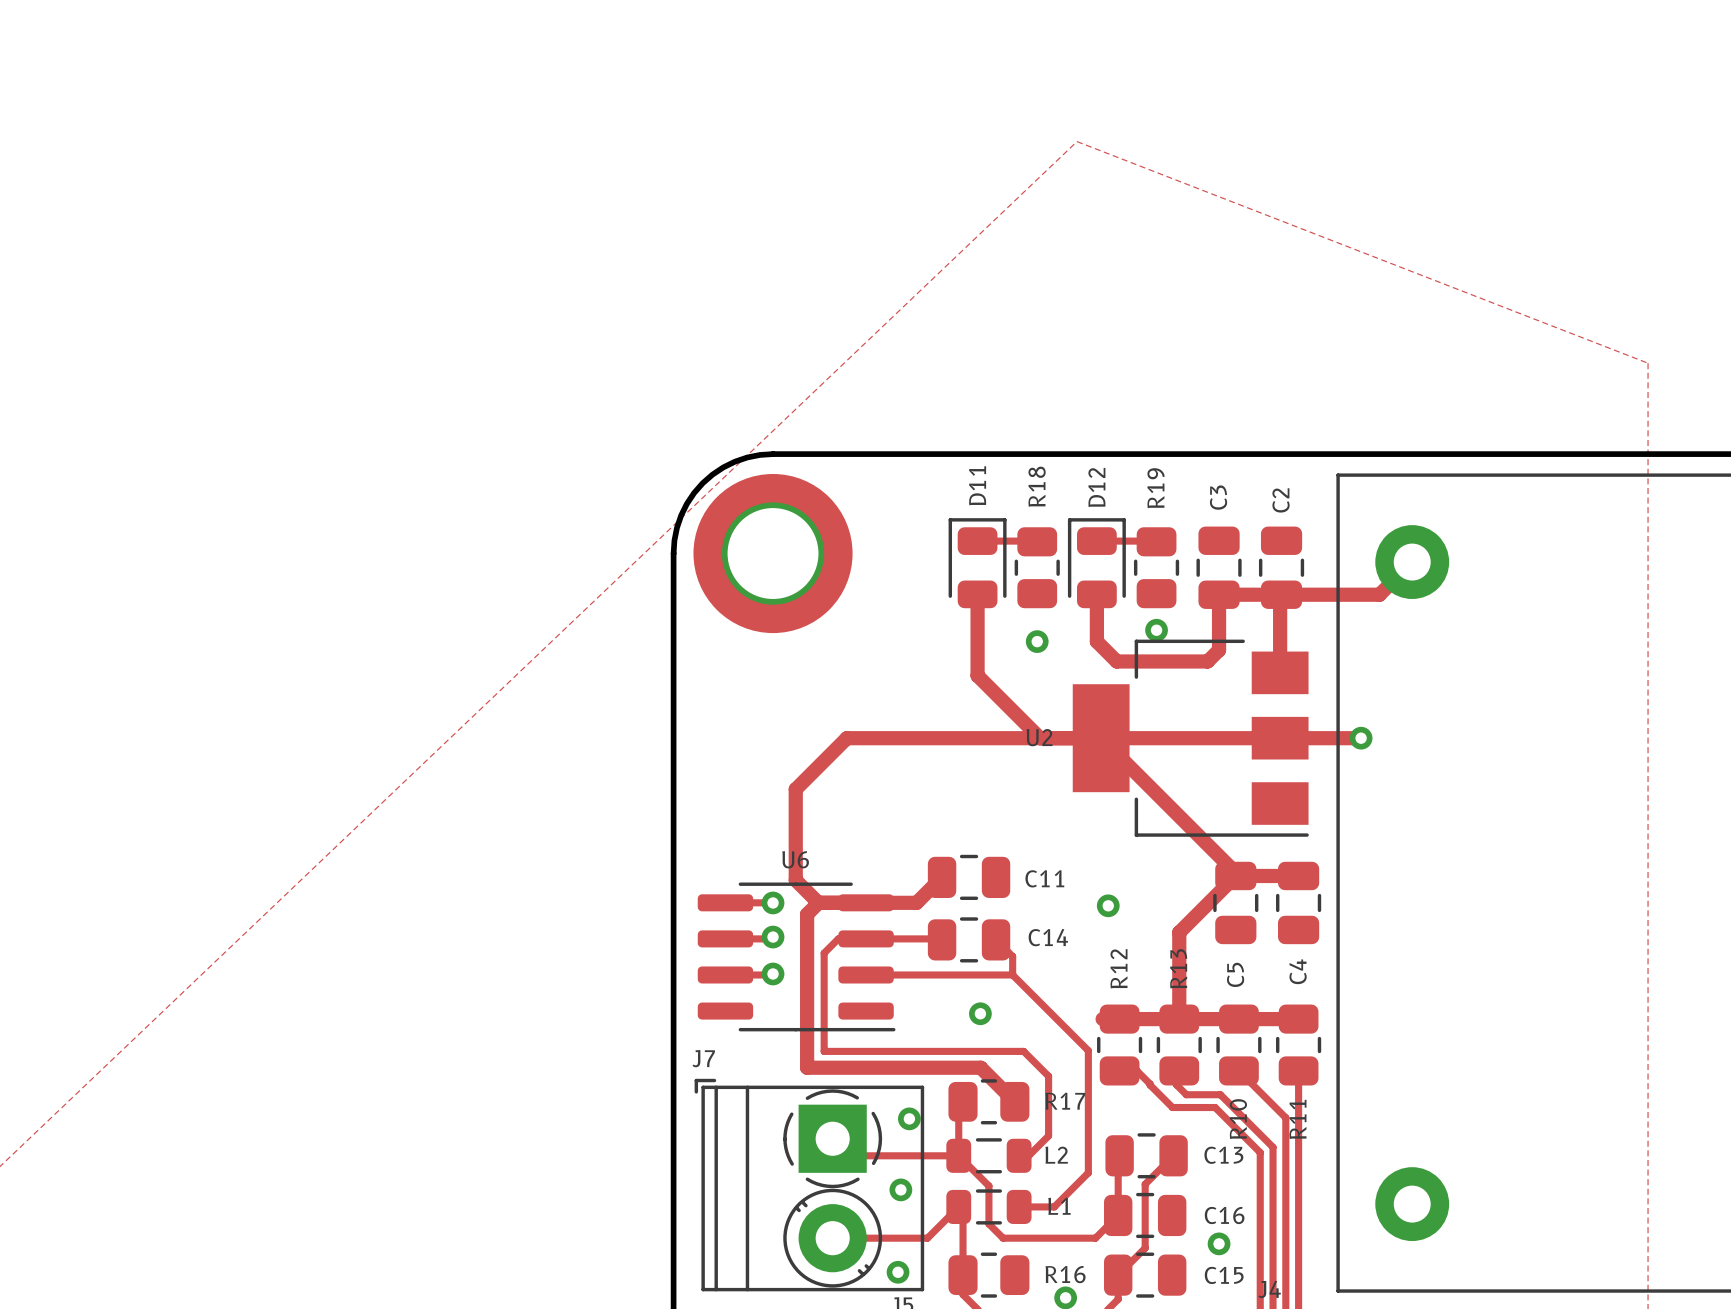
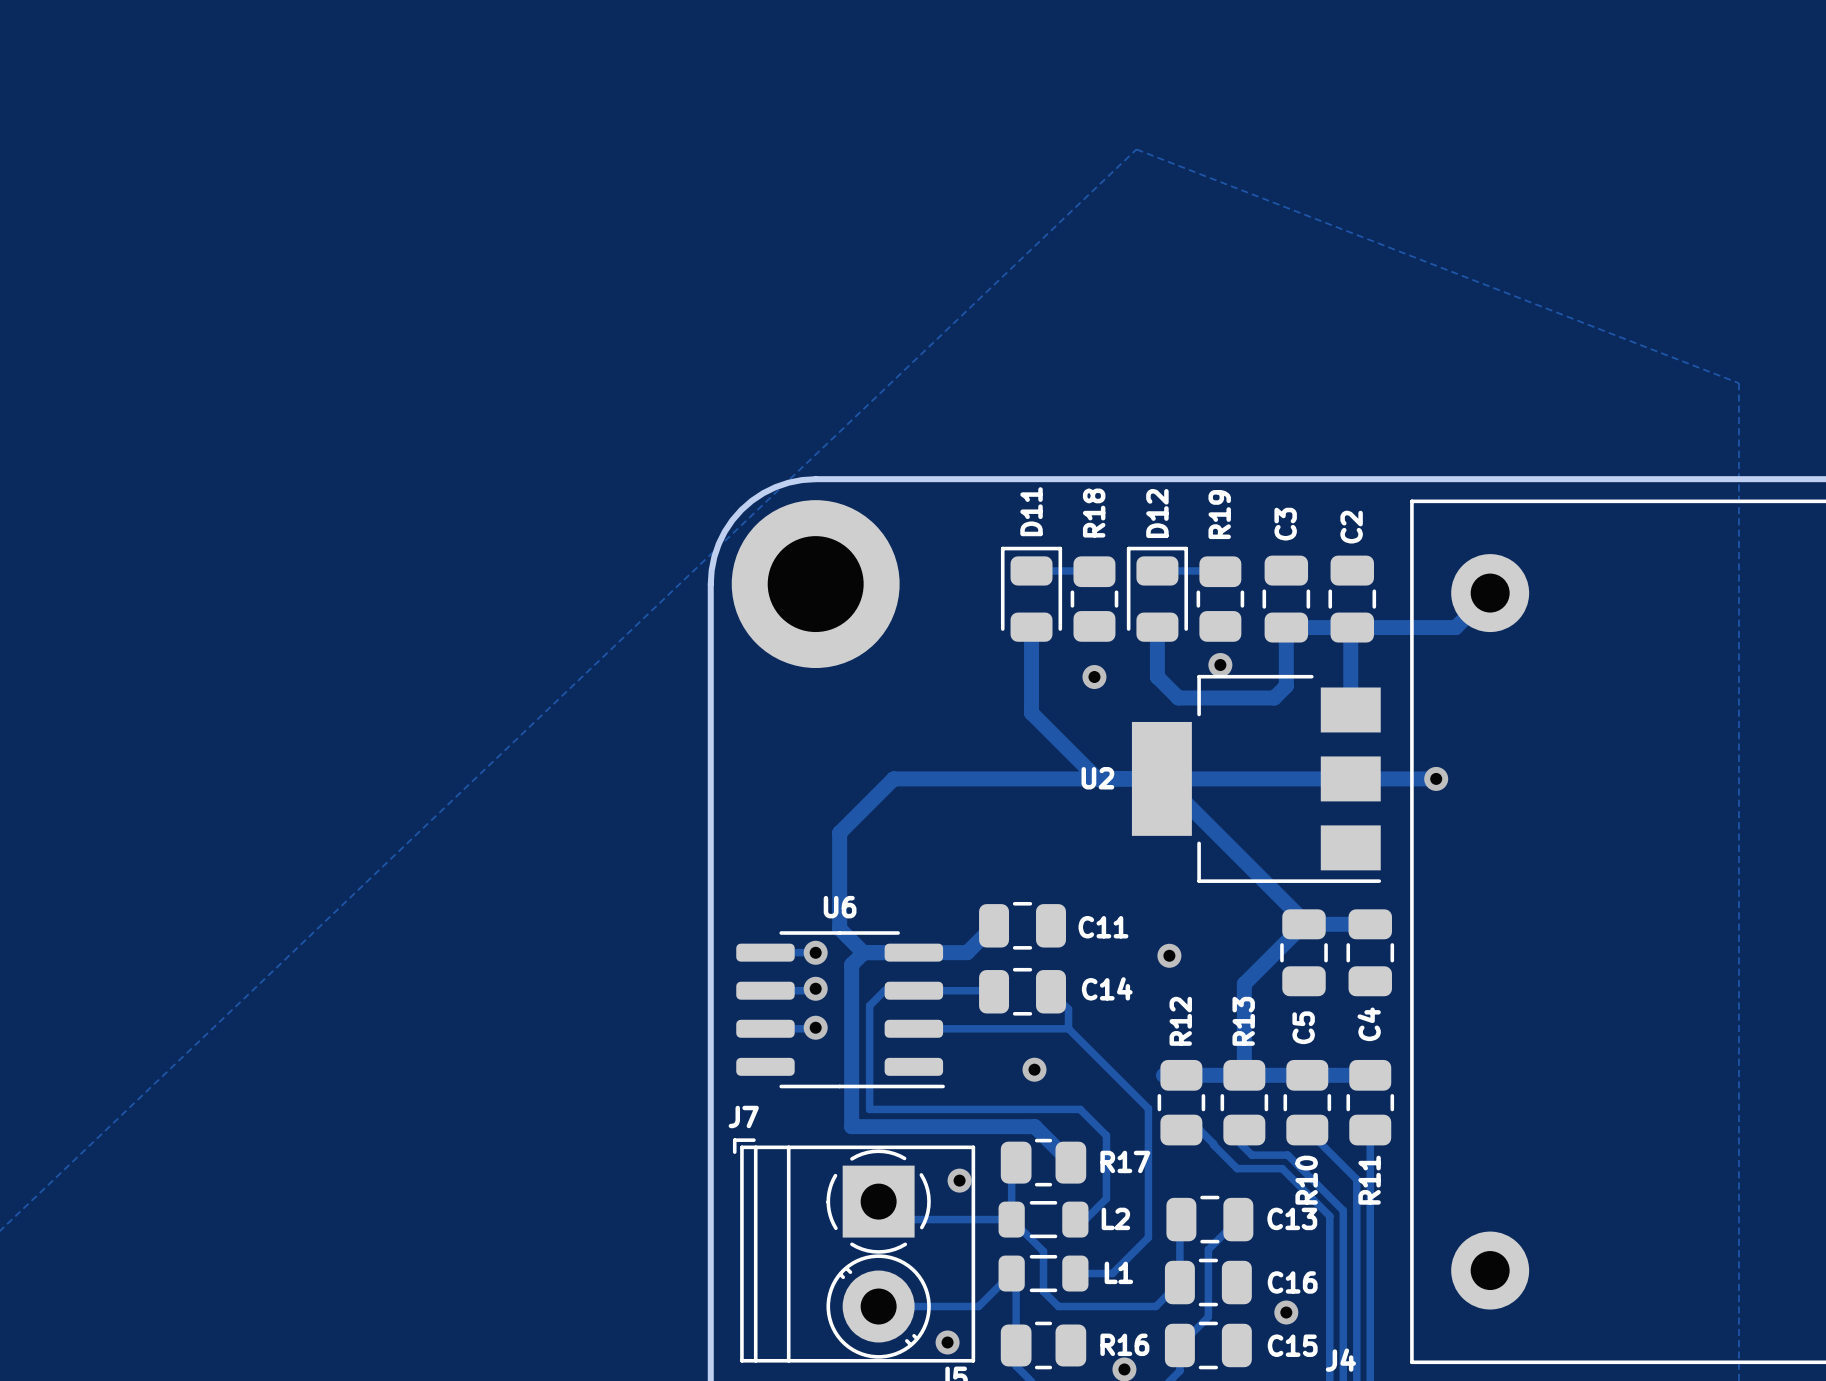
via: (900, 1189) -> none

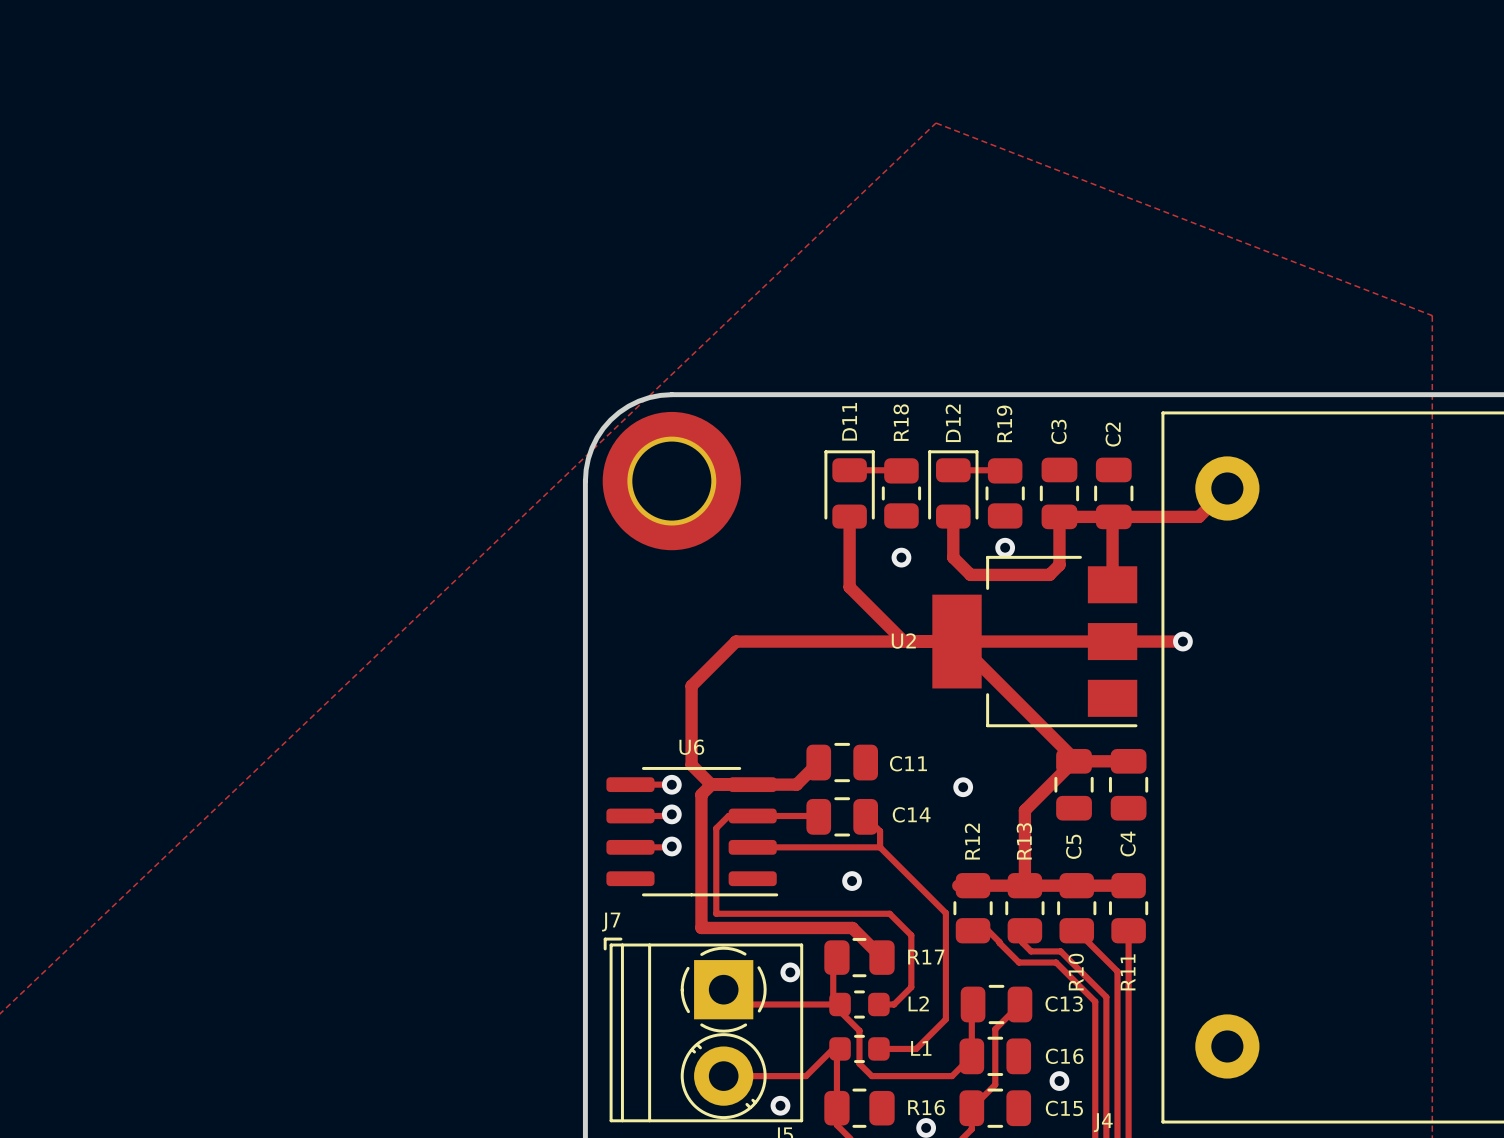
L2 footprint: [998, 1201, 1089, 1239] -> [829, 990, 890, 1019]
L1 footprint: [998, 1254, 1089, 1293] -> [829, 1034, 890, 1064]

